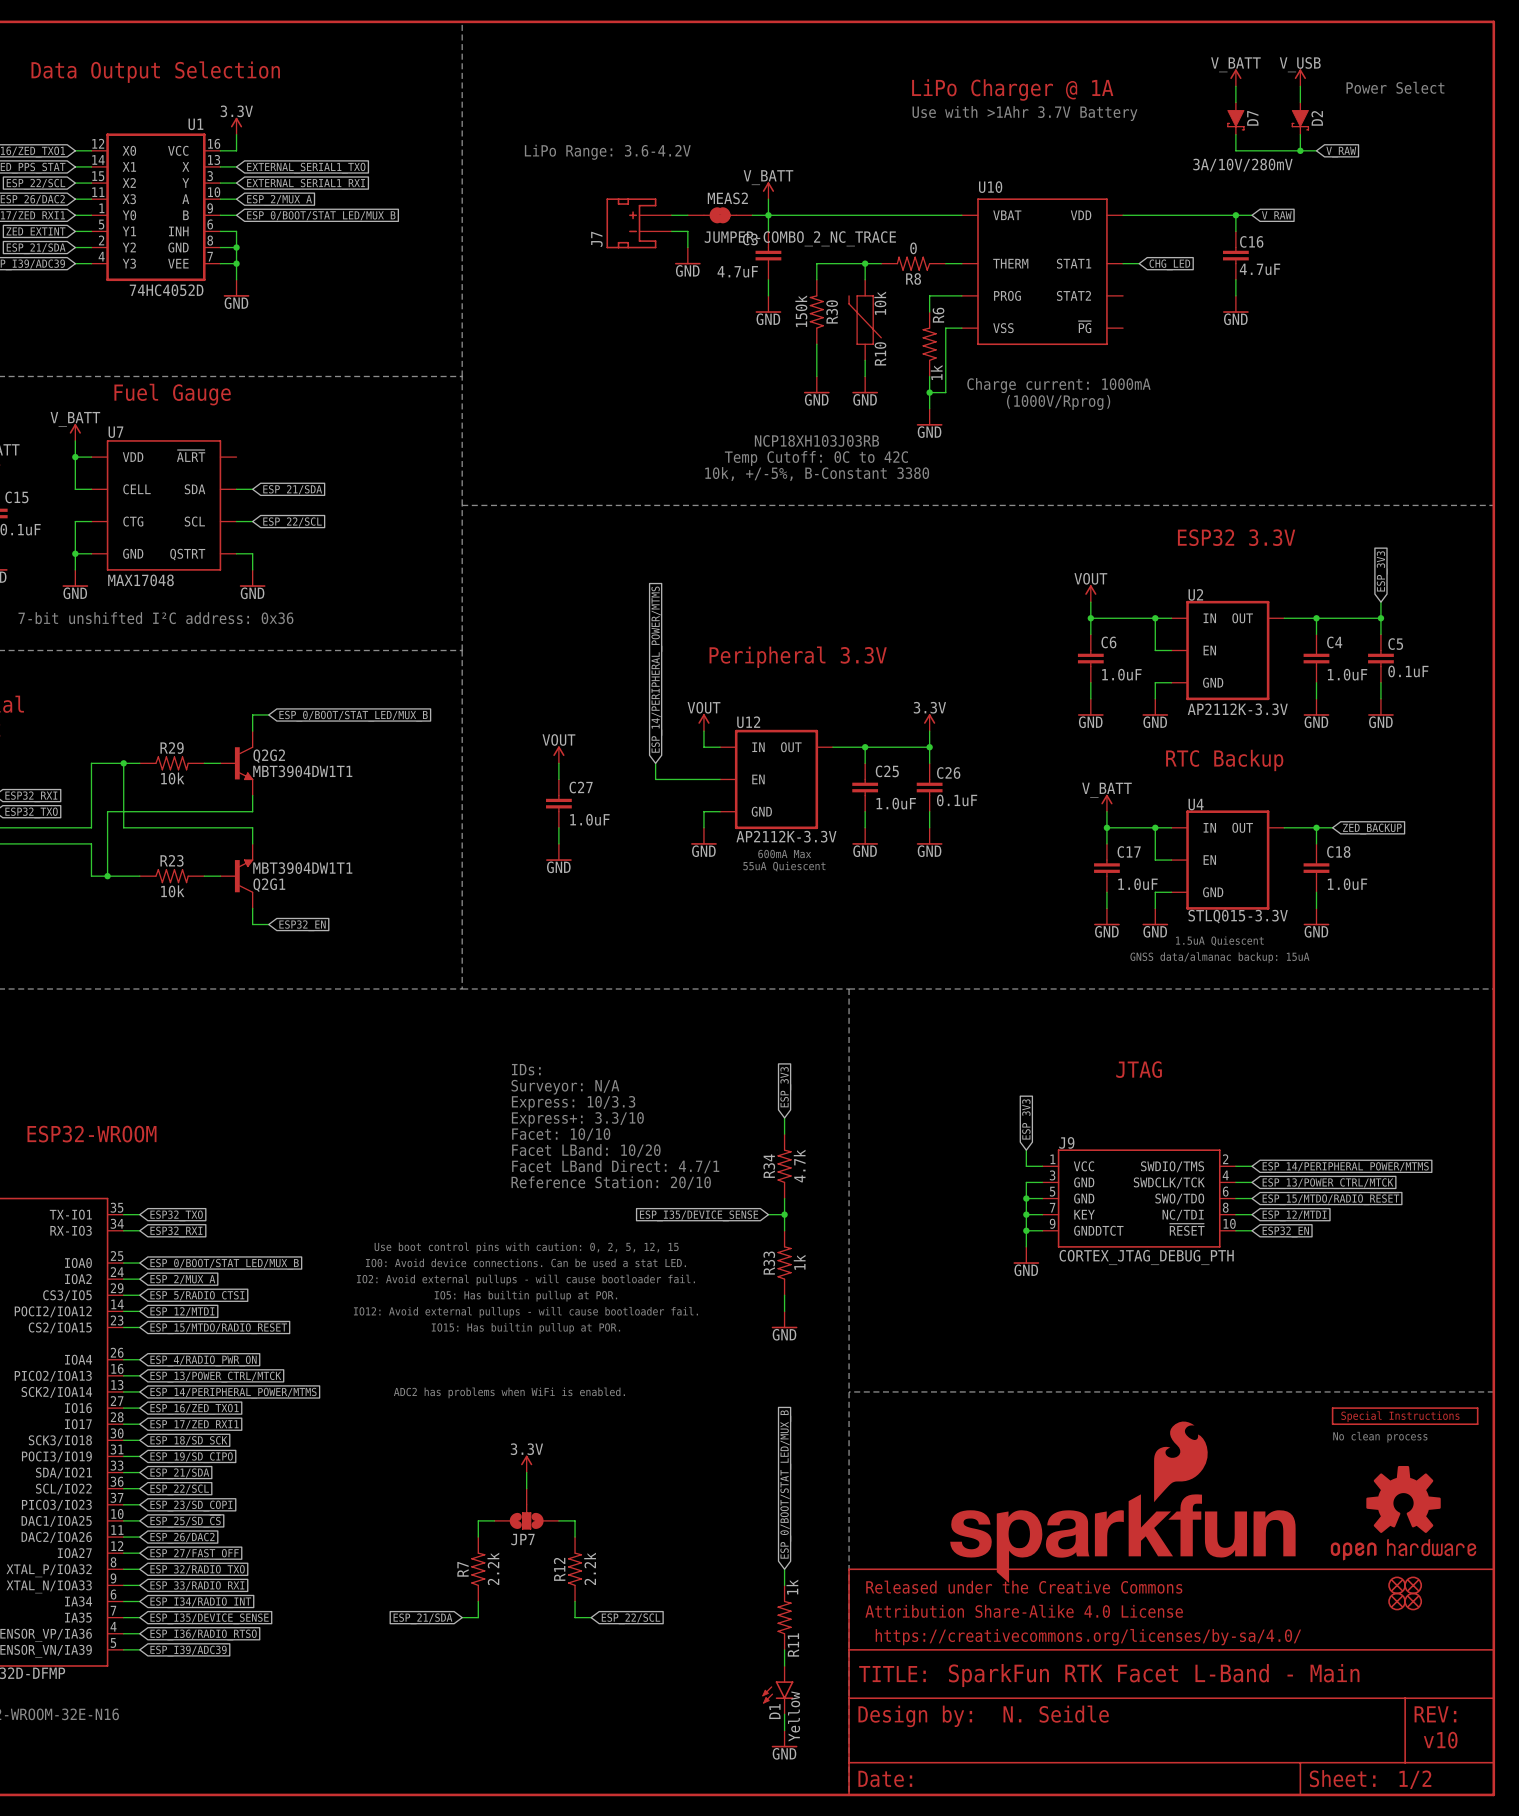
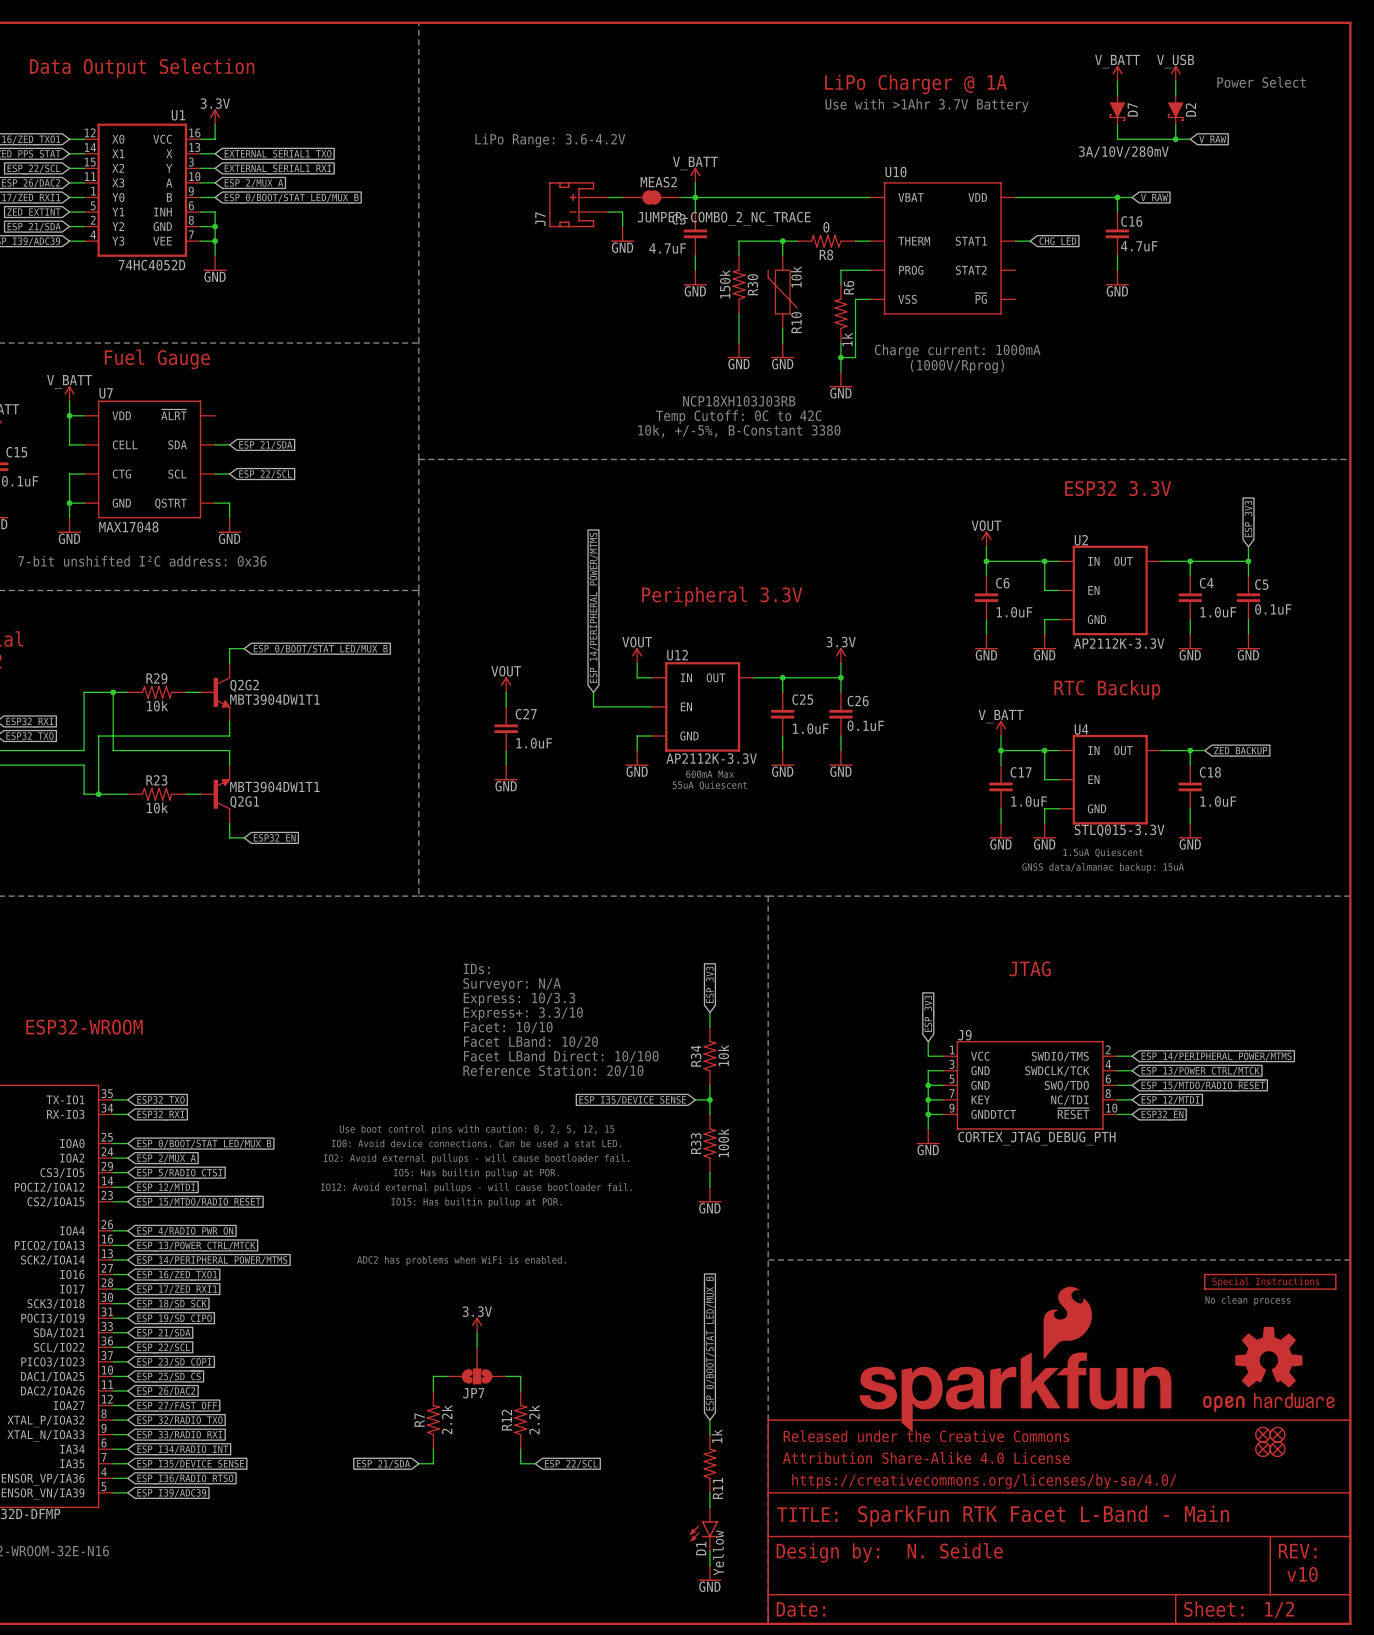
text: Facet LBand Direct: 4.7/1 (615, 1166) -> Facet LBand Direct: 10/100 (561, 1056)
R34 value: 4.7k (799, 1166) -> 10k (723, 1055)
R33 value: 1k (799, 1262) -> 100k (723, 1142)

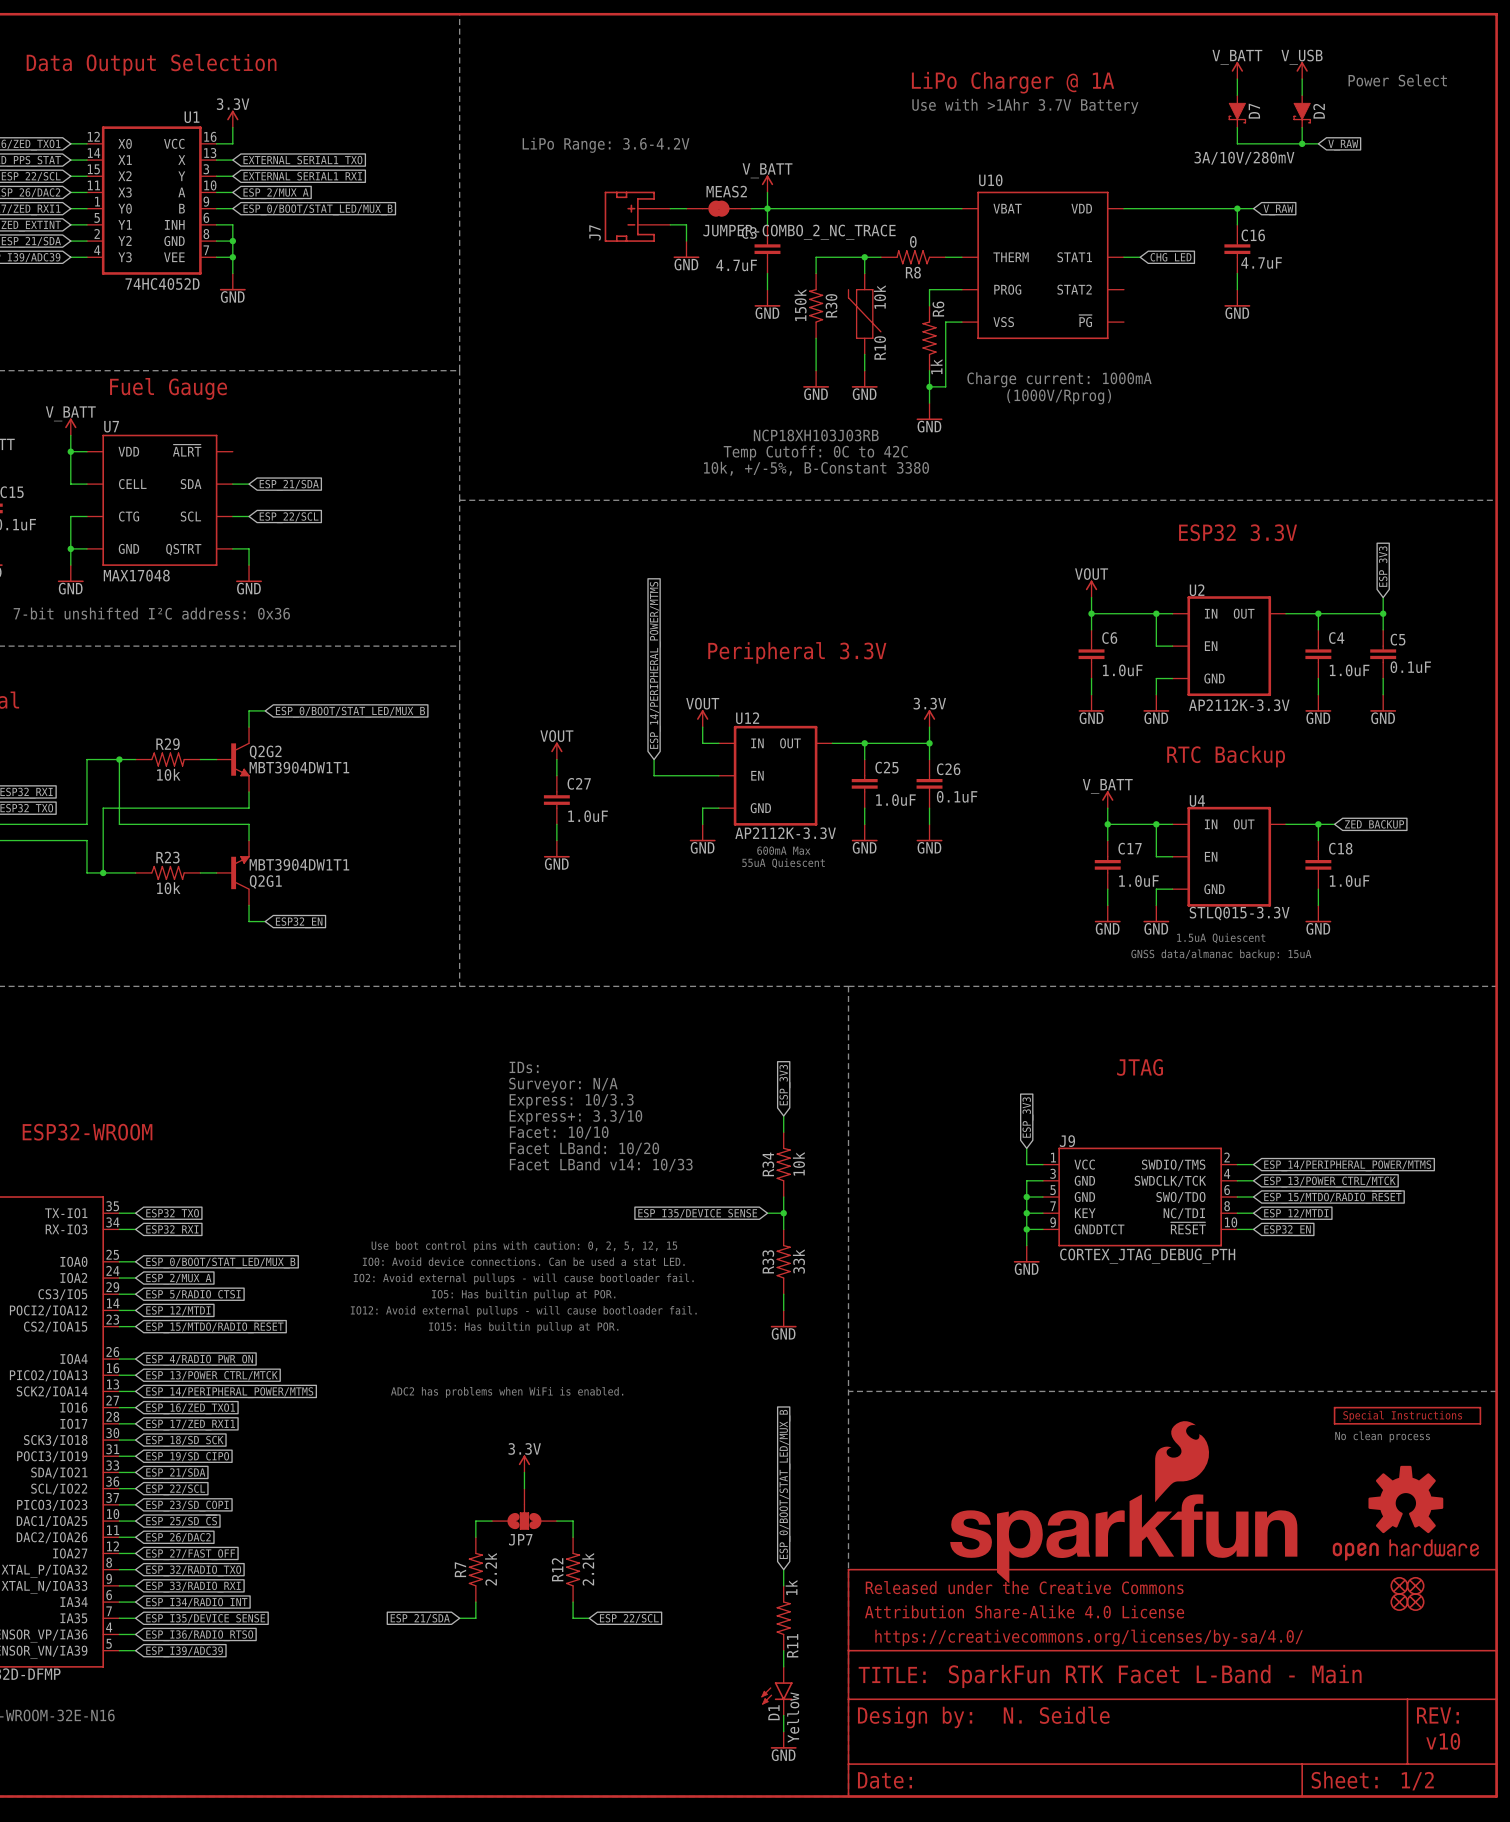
text: Facet LBand Direct: 10/100 (561, 1056) -> Facet LBand v14: 10/33 (601, 1165)
text: Reference Station: 20/10 (553, 1071) -> none
R33 value: 100k (723, 1142) -> 33k (798, 1261)

